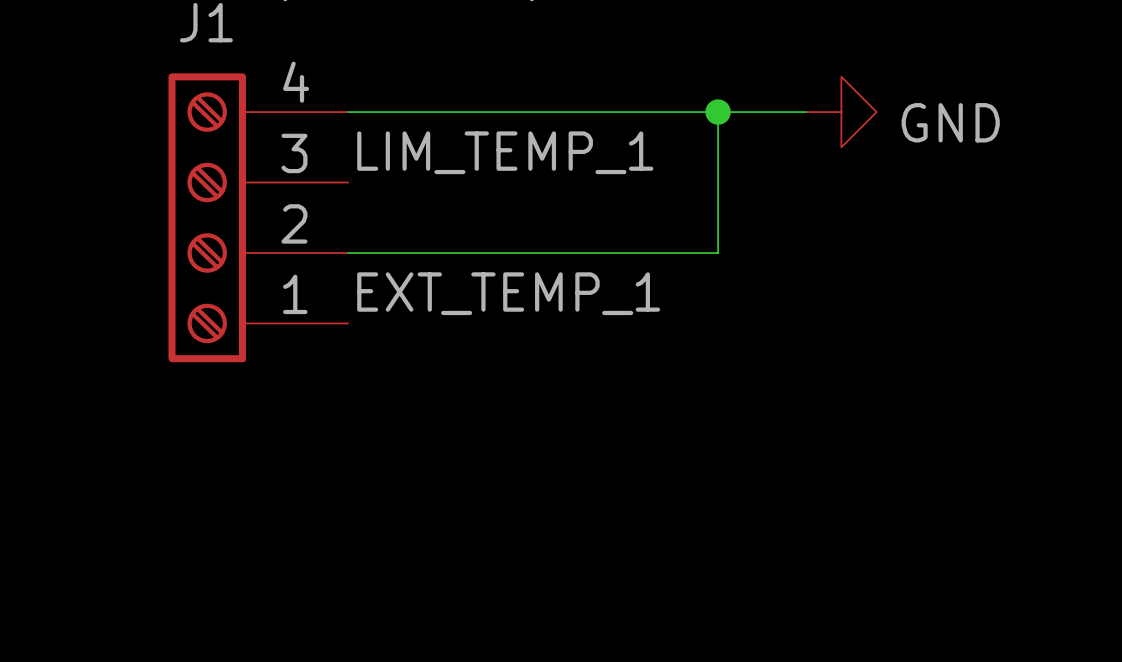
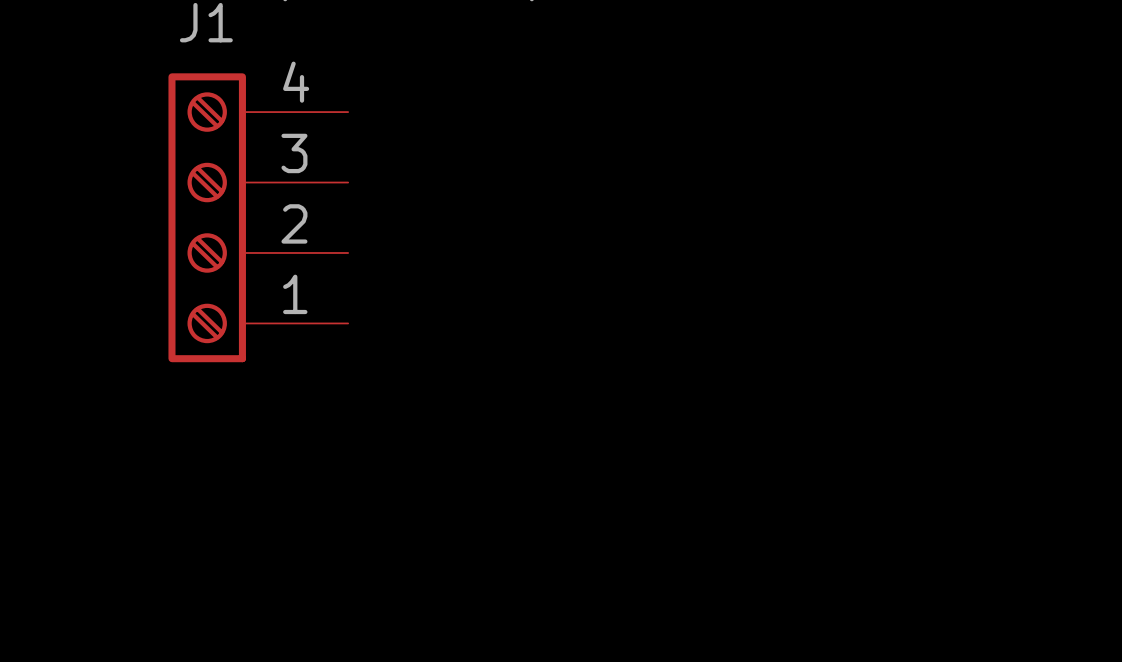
wire: (348, 112) (806, 112) -> none
wire: (718, 112) (718, 252) (348, 252) -> none
junction: (718, 112) -> none
power symbol: GND (841, 112) -> none
label: LIM_TEMP_1 (505, 152) -> none
label: EXT_TEMP_1 (508, 293) -> none

